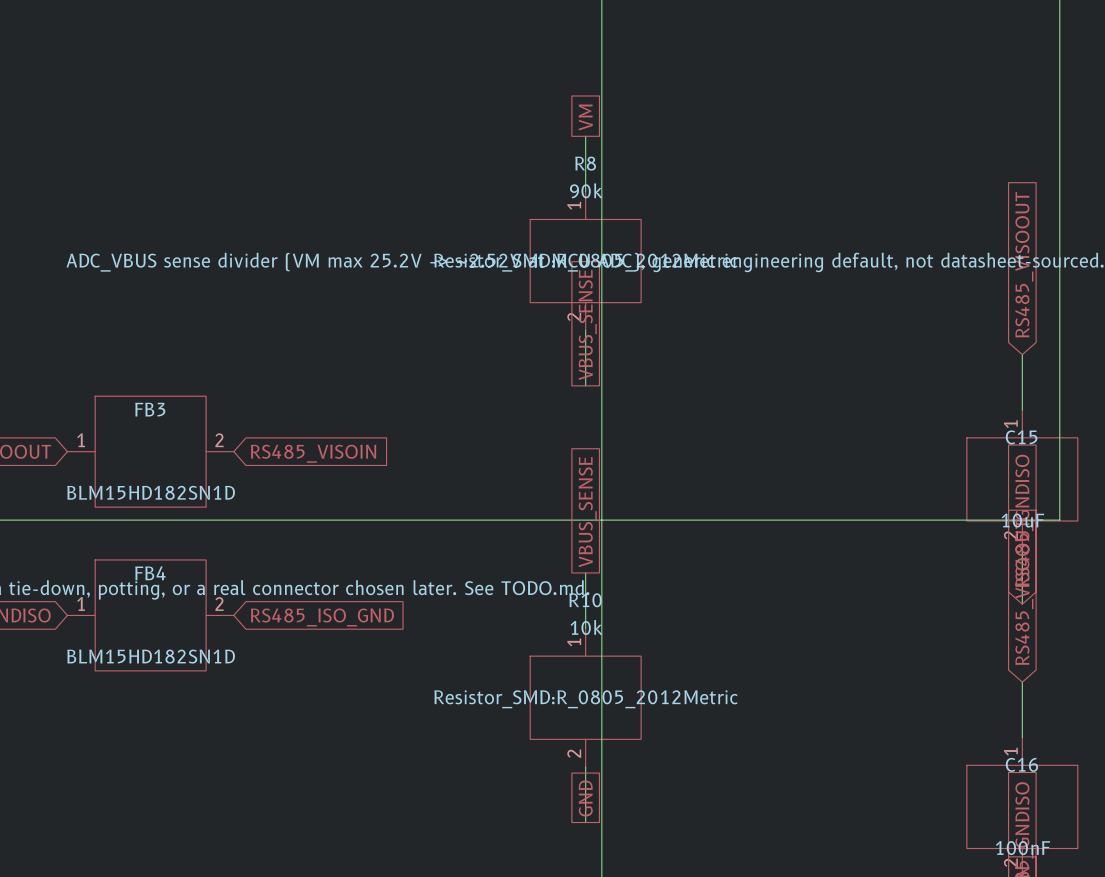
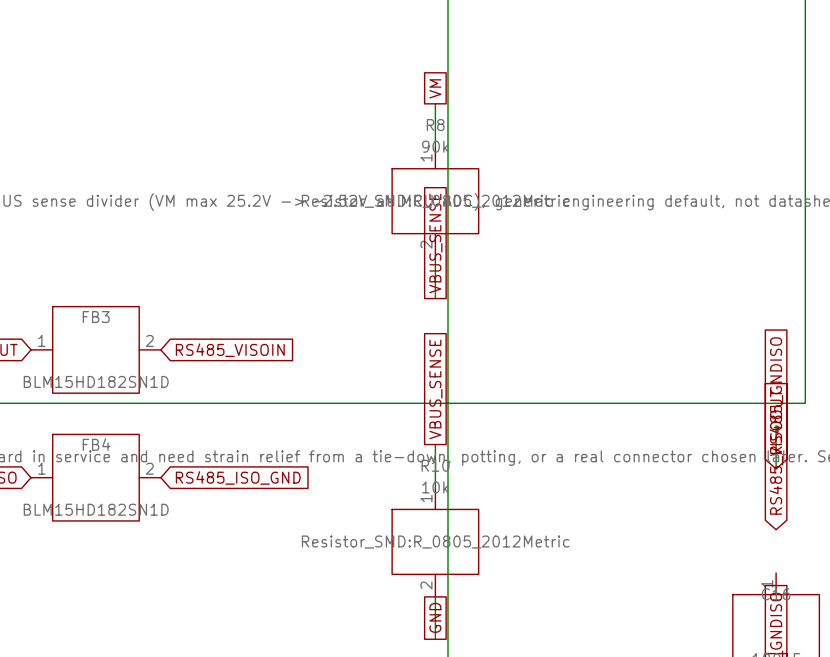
global label: RS485_VISOOUT (1024, 264) -> none
wire: (1022, 354) (1022, 410) -> none
C15: 10uF (1022, 479) -> none
wire: (1022, 682) (1022, 737) -> none

